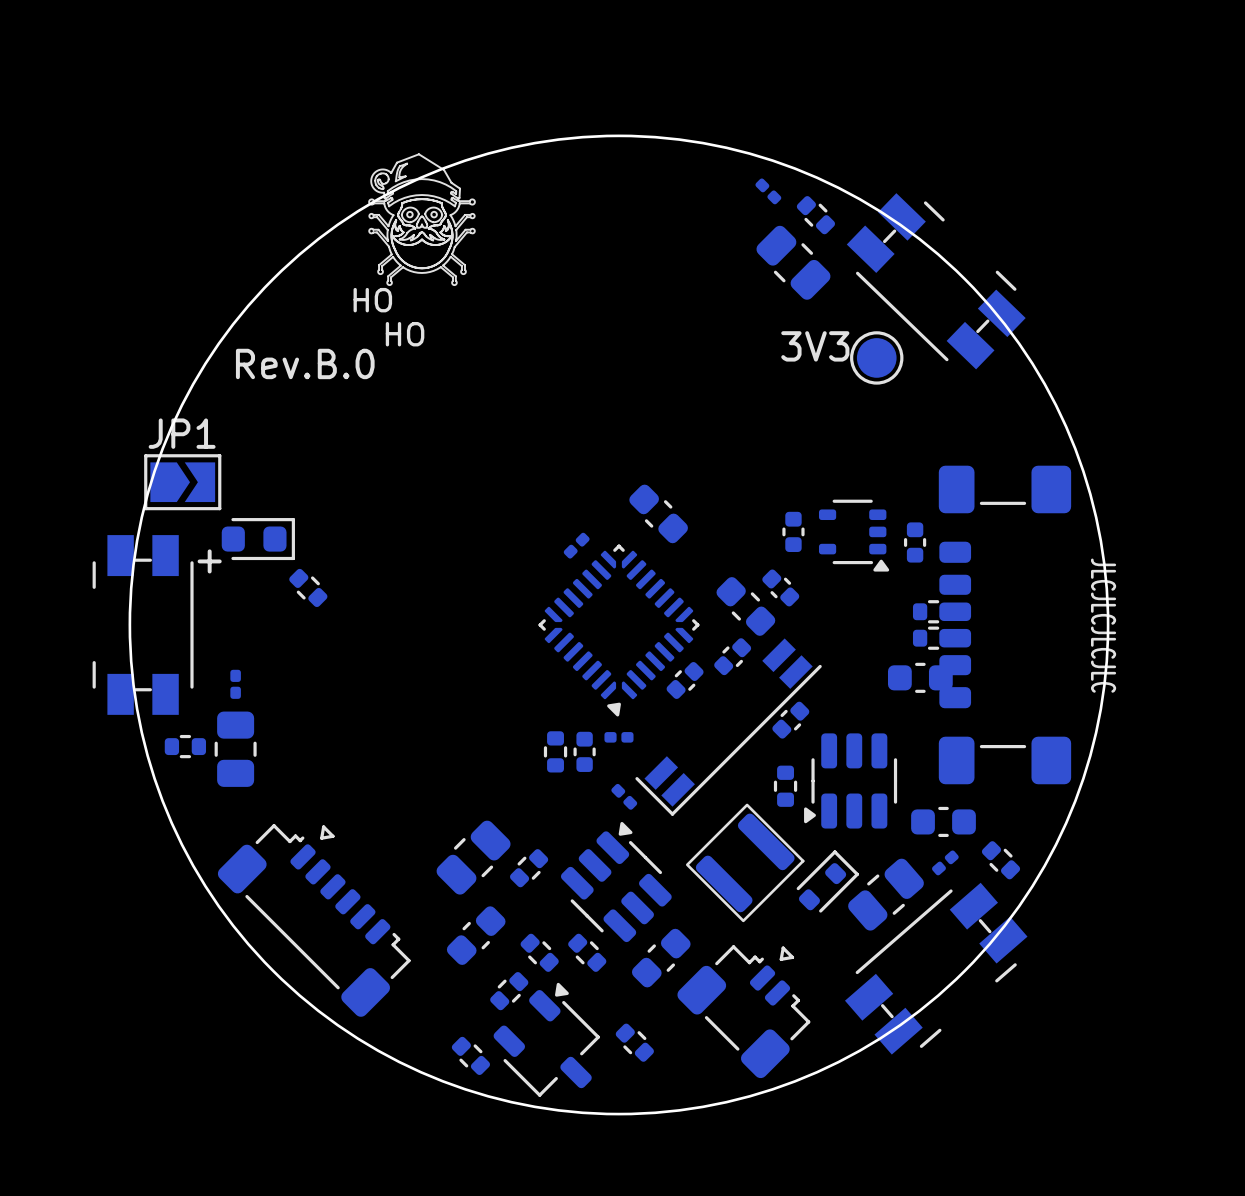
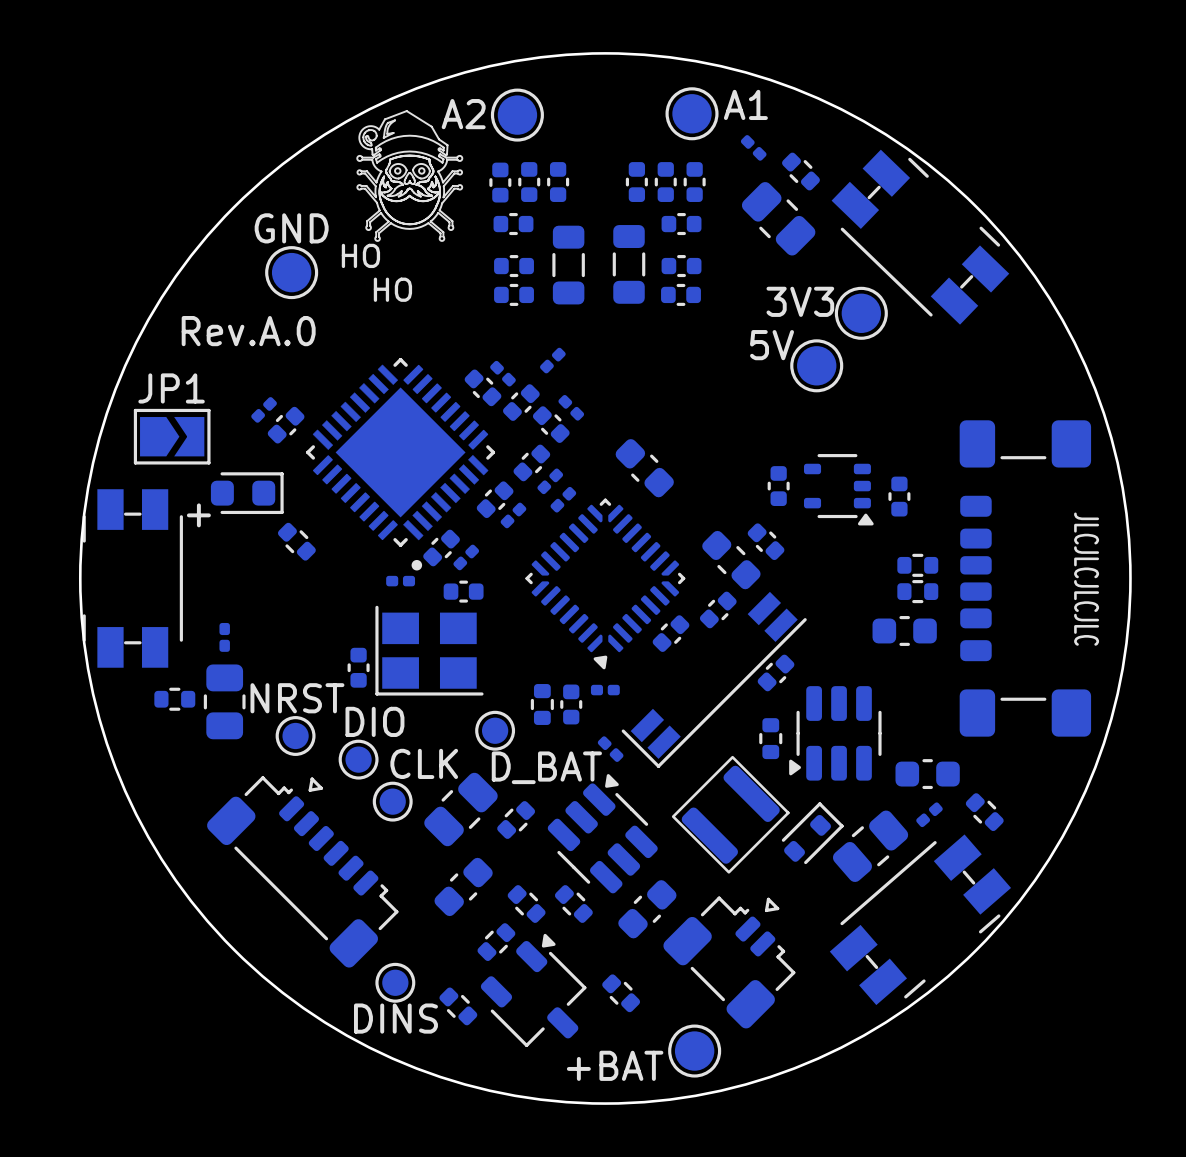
round board edge size: [128, 134, 1110, 1116] -> [78, 52, 1132, 1105]
A1: none -> (692, 113)
A2: none -> (517, 115)
part: none -> (529, 182)
part: none -> (558, 182)
part: none -> (636, 182)
part: none -> (665, 182)
part: none -> (694, 182)
part: none -> (500, 182)
part: none -> (513, 224)
part: none -> (681, 224)
part: none -> (629, 264)
part: none -> (568, 265)
part: none -> (514, 266)
part: none -> (681, 266)
GND: none -> (291, 272)
part: none -> (514, 294)
part: none -> (680, 294)
text: Rev.B.0 (305, 363) -> Rev.A.0 (248, 331)
part: none -> (552, 360)
5V: none -> (816, 365)
part: none -> (502, 373)
part: none -> (483, 387)
part: none -> (521, 402)
part: none -> (571, 407)
part: none -> (264, 409)
part: none -> (286, 425)
part: none -> (551, 424)
part: none -> (531, 462)
part: none -> (400, 464)
part: none -> (550, 481)
part: none -> (495, 499)
part: none -> (513, 515)
part: none -> (441, 548)
part: none -> (466, 557)
part position: (1004, 624) -> (1025, 578)
part: none -> (400, 581)
part: none -> (463, 591)
part: none -> (429, 650)
part: none -> (358, 667)
D_BAT: none -> (495, 730)
NRST: none -> (295, 735)
DIO: none -> (358, 759)
CLK: none -> (392, 801)
DINS: none -> (395, 982)
+BAT: none -> (694, 1051)

